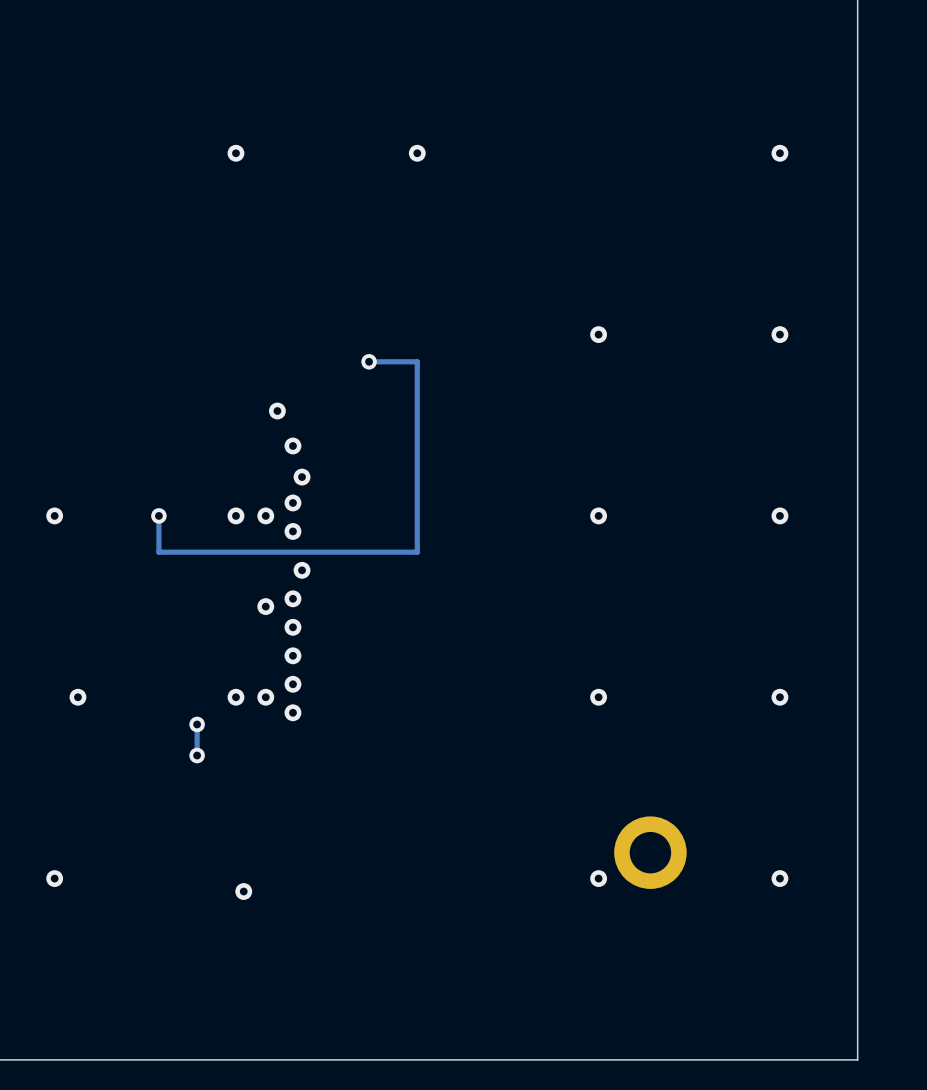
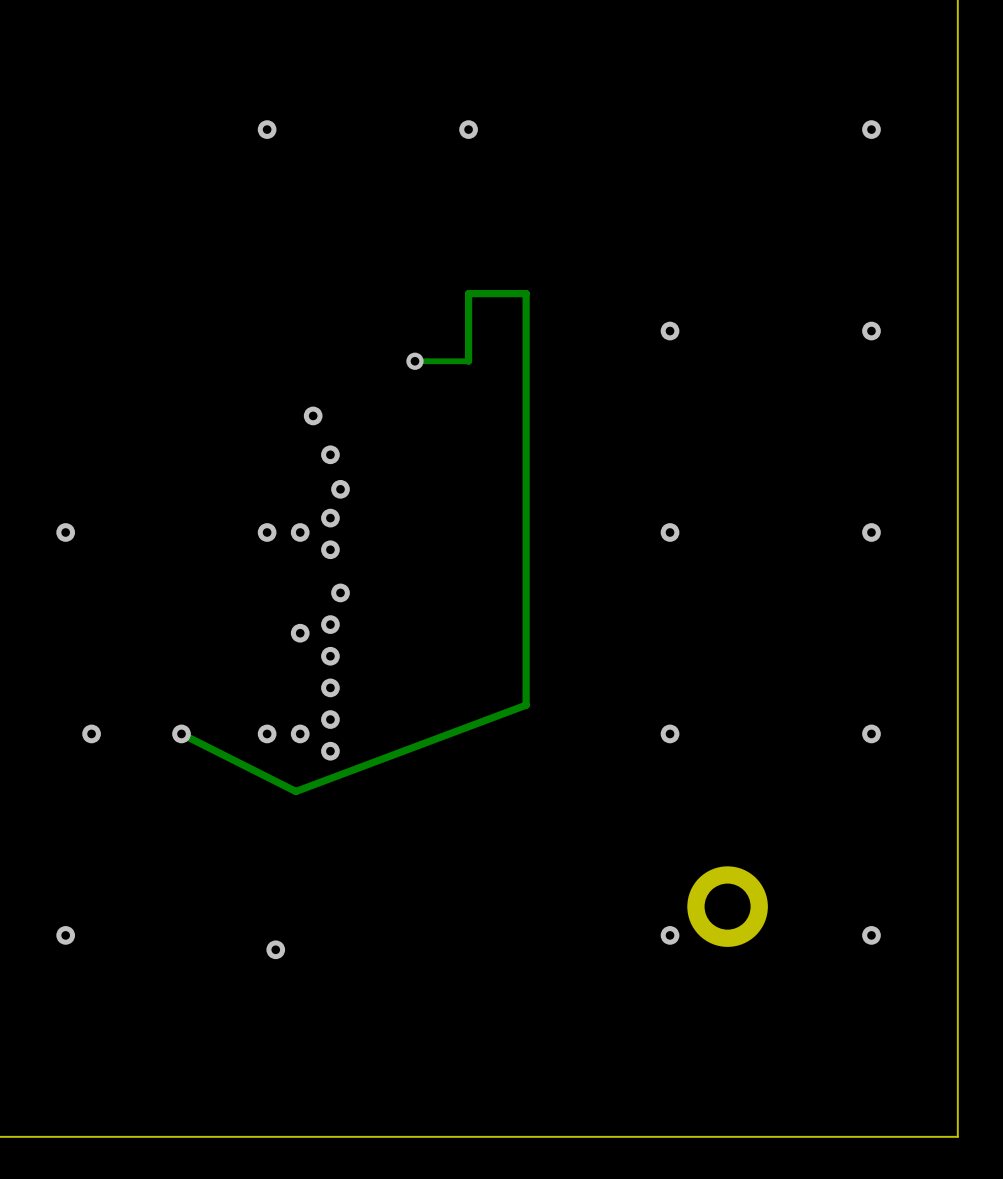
track: (417, 361) (417, 552) (158, 552) (158, 515) -> (468, 361) (468, 293) (526, 293) (526, 705) (295, 791) (181, 733)
via: (158, 515) -> none
via: none -> (181, 733)
track: (197, 724) (197, 755) -> none
via: (197, 724) -> none
via: (197, 755) -> none

